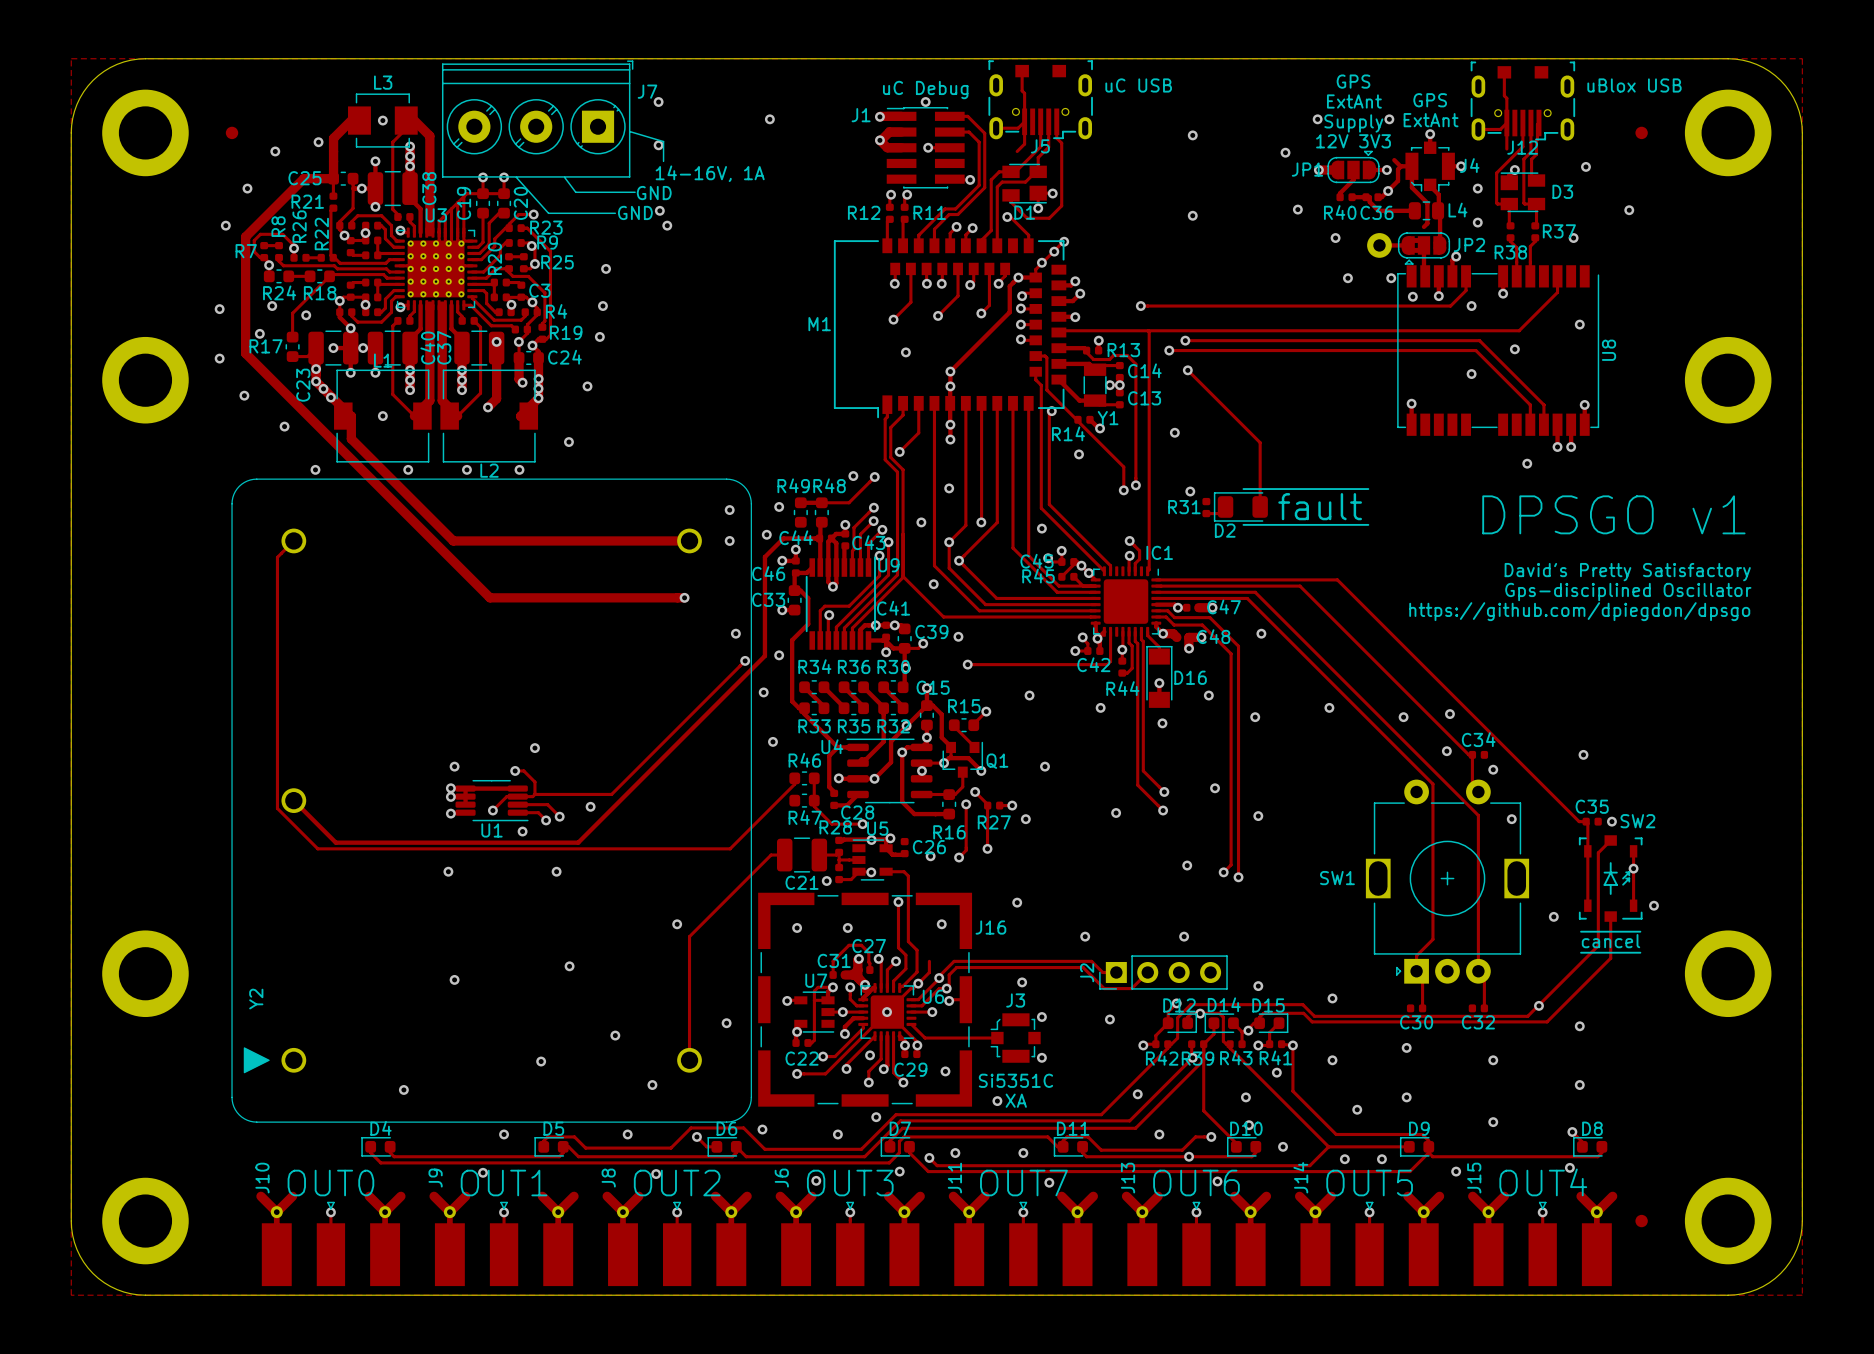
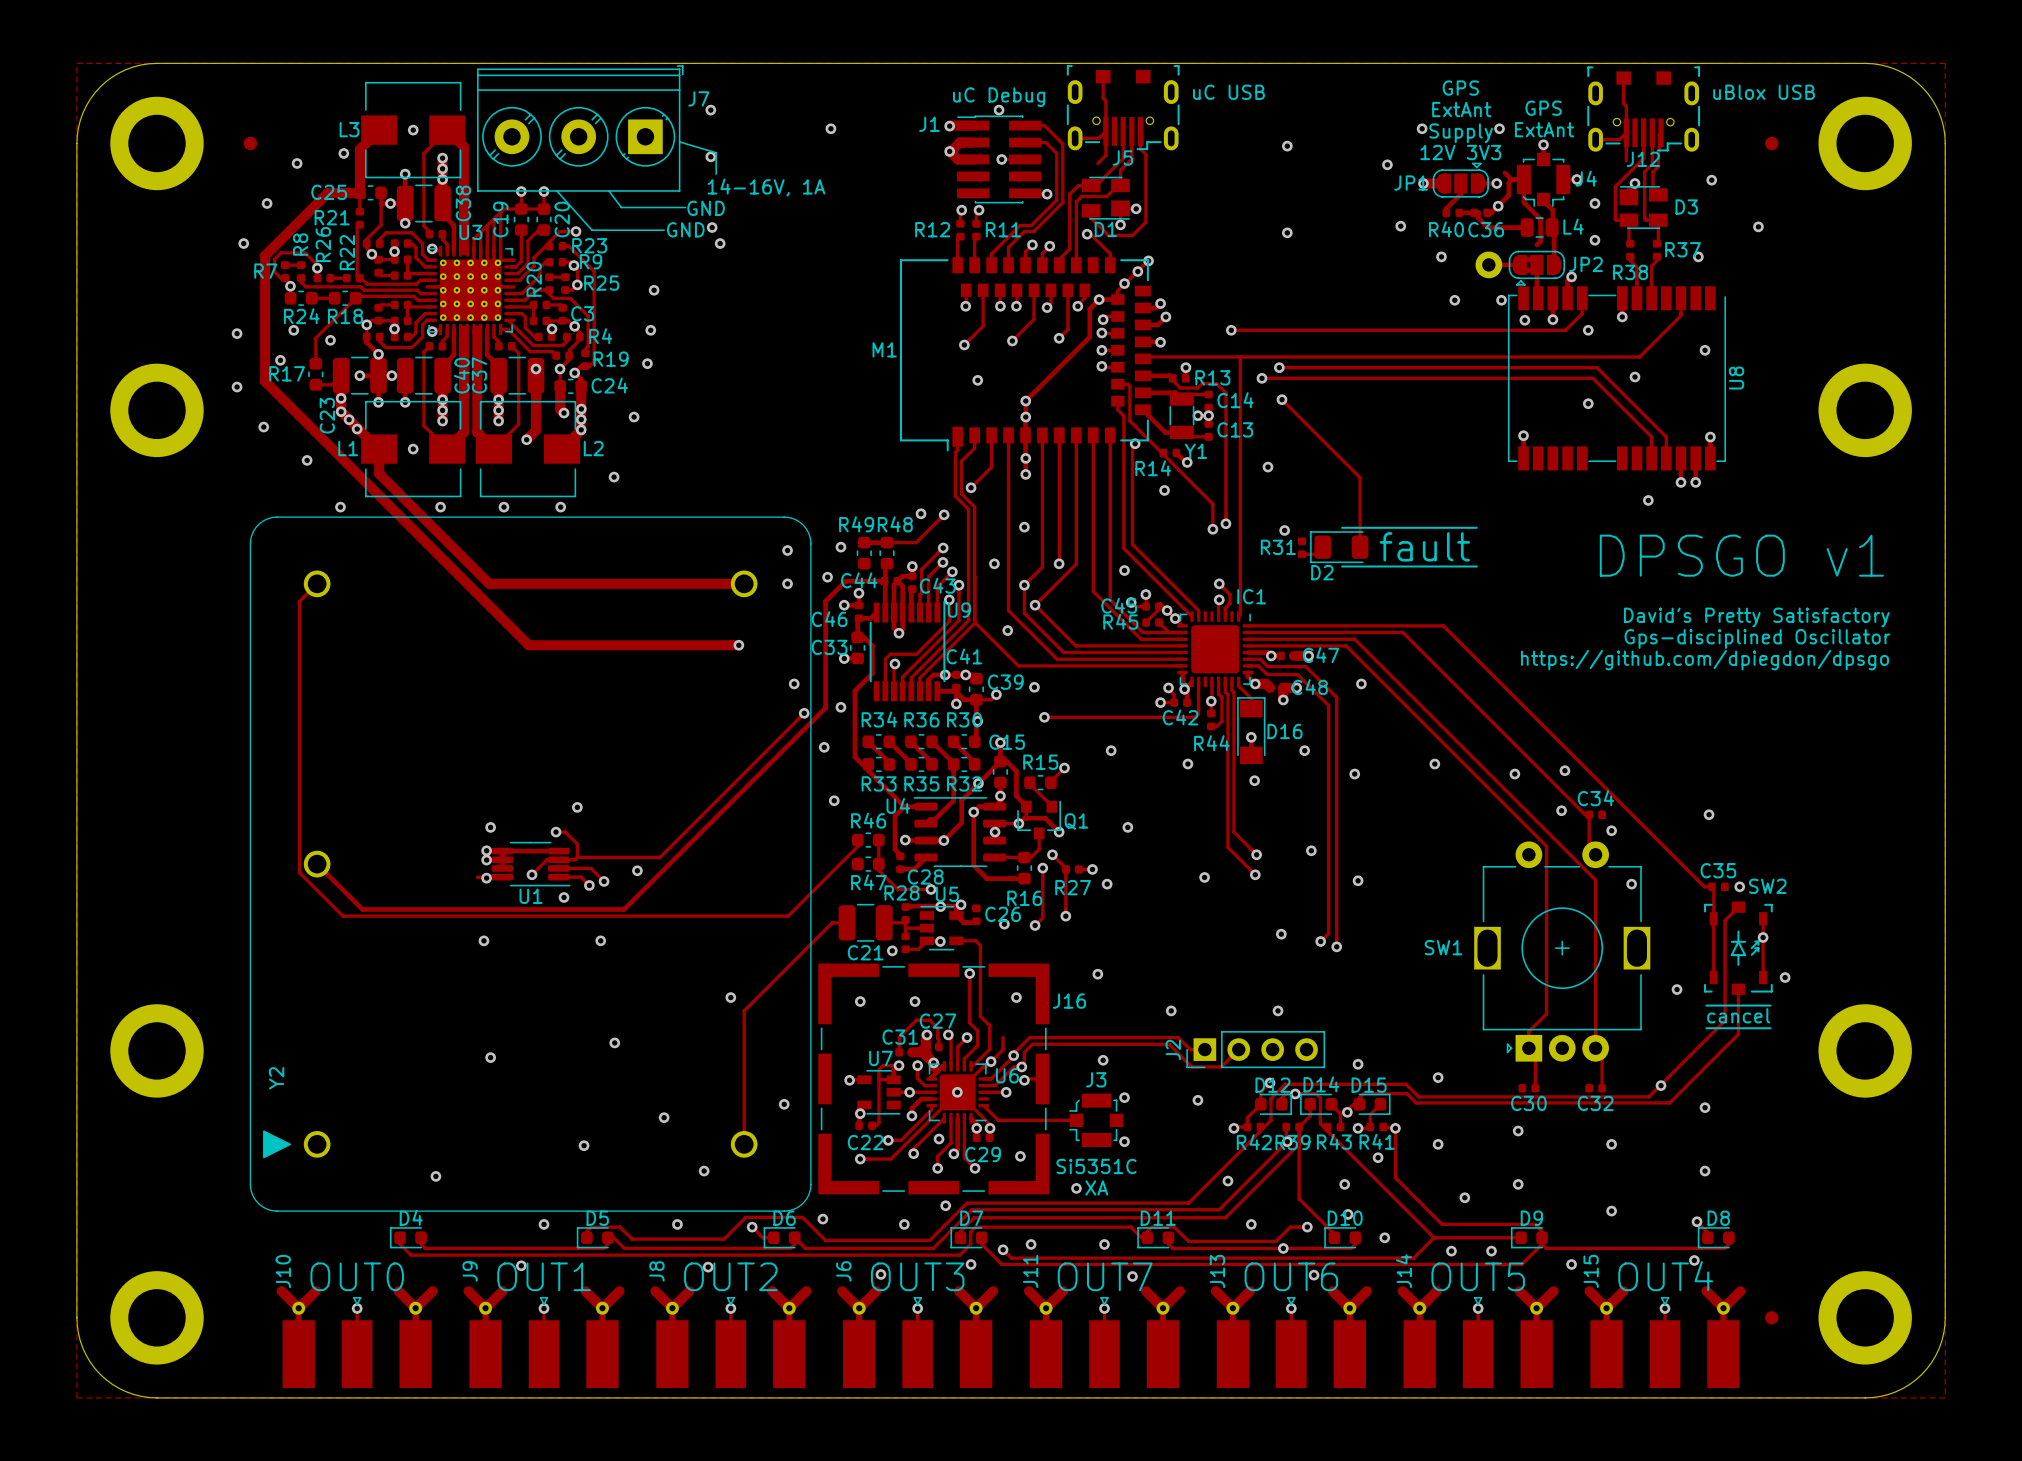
L3 name position: L3 (383, 82) -> L3 (349, 129)
L3 footprint: [348, 93, 418, 148] -> [361, 81, 466, 179]
L1 name position: L1 (383, 360) -> L1 (348, 448)
L1 footprint: [334, 369, 432, 463] -> [361, 400, 466, 498]
L2 footprint: [440, 369, 539, 463] -> [475, 400, 581, 498]
L2 name position: L2 (489, 470) -> L2 (593, 448)
track: none -> (477, 877) (486, 877)

